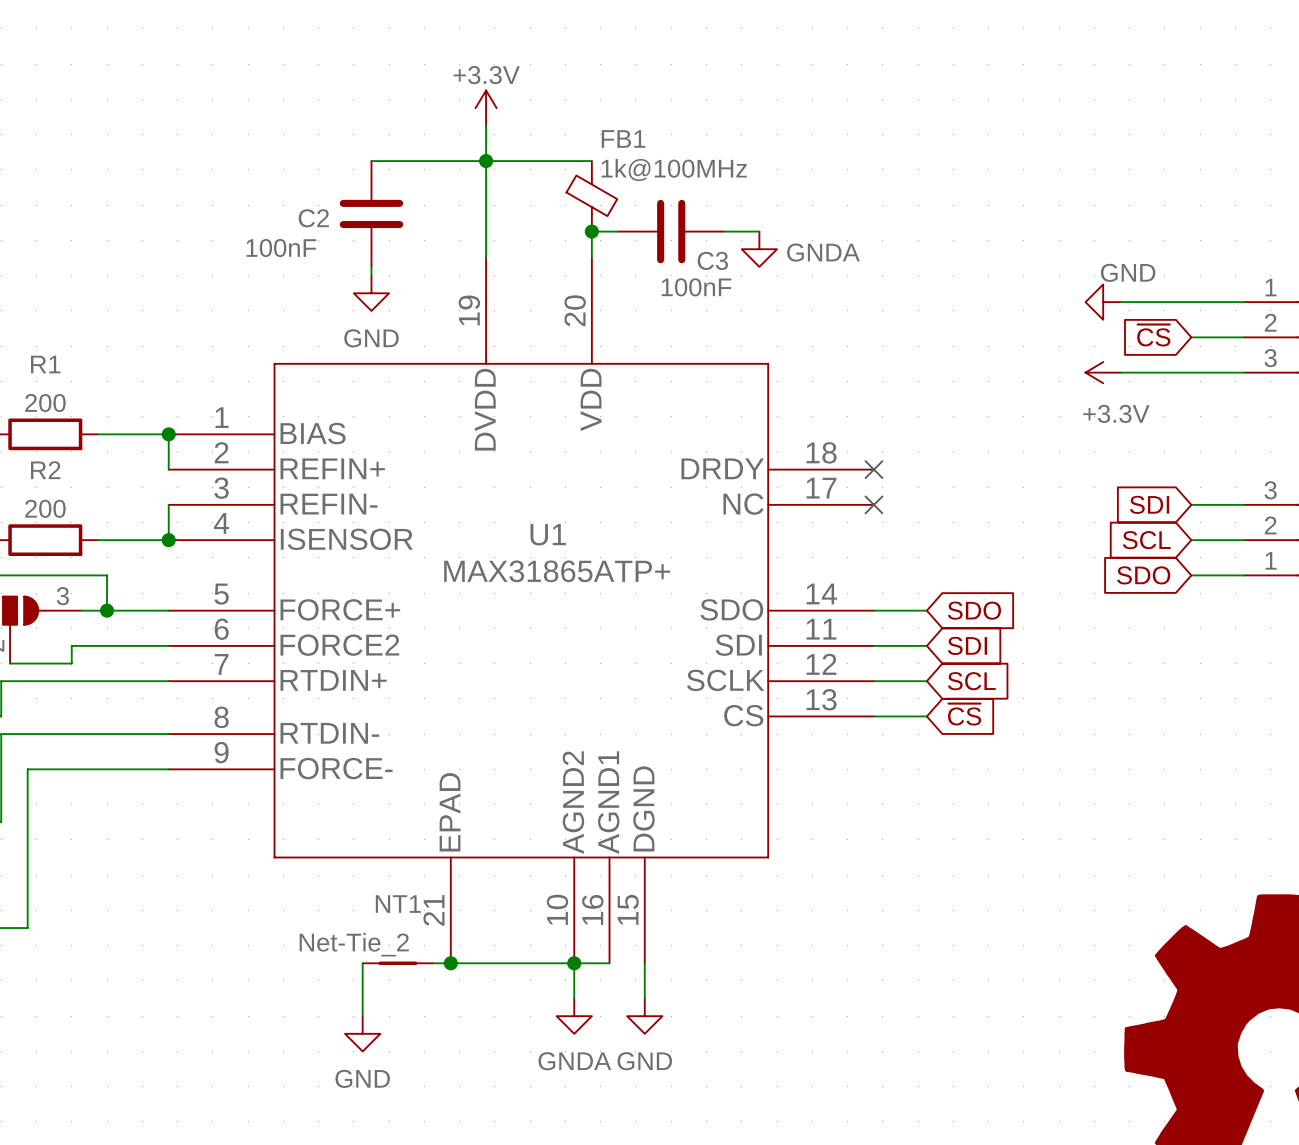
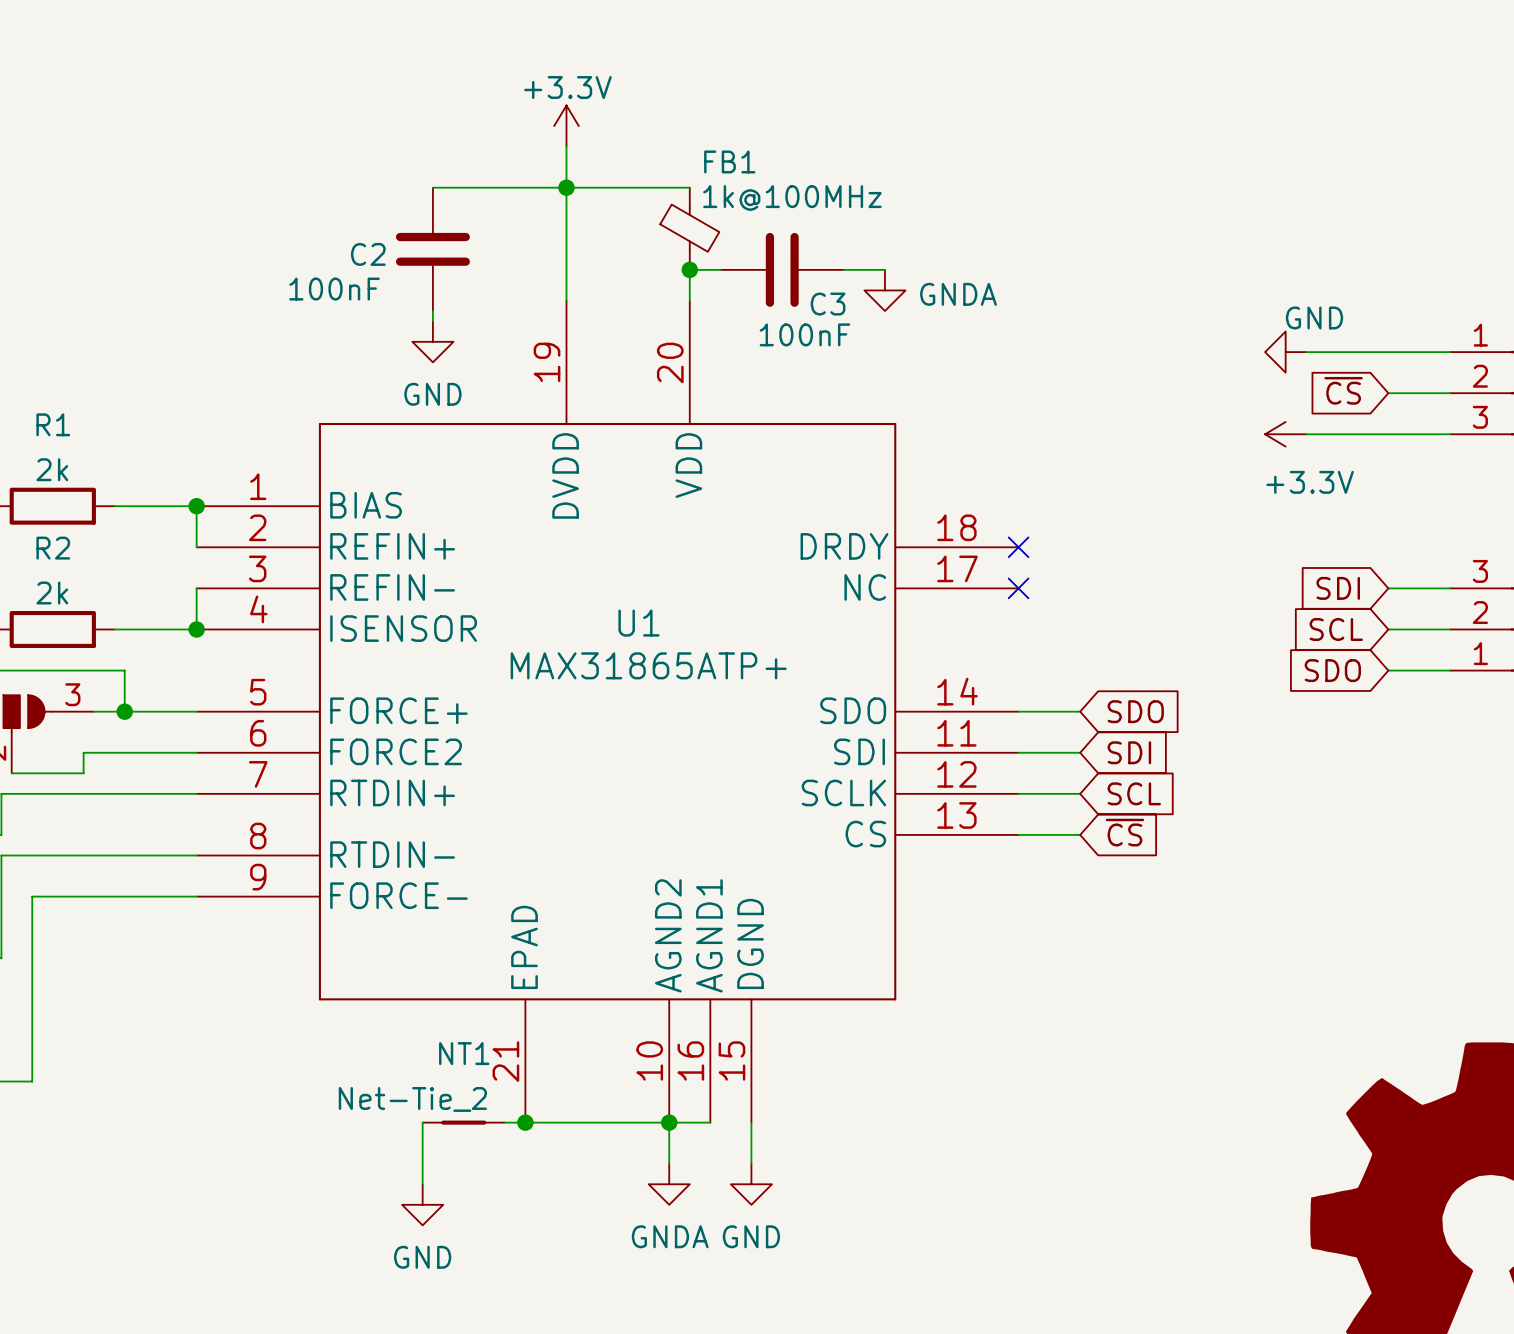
R1 value: 200 (45, 403) -> 2k (52, 469)
R2 value: 200 (45, 508) -> 2k (52, 593)

